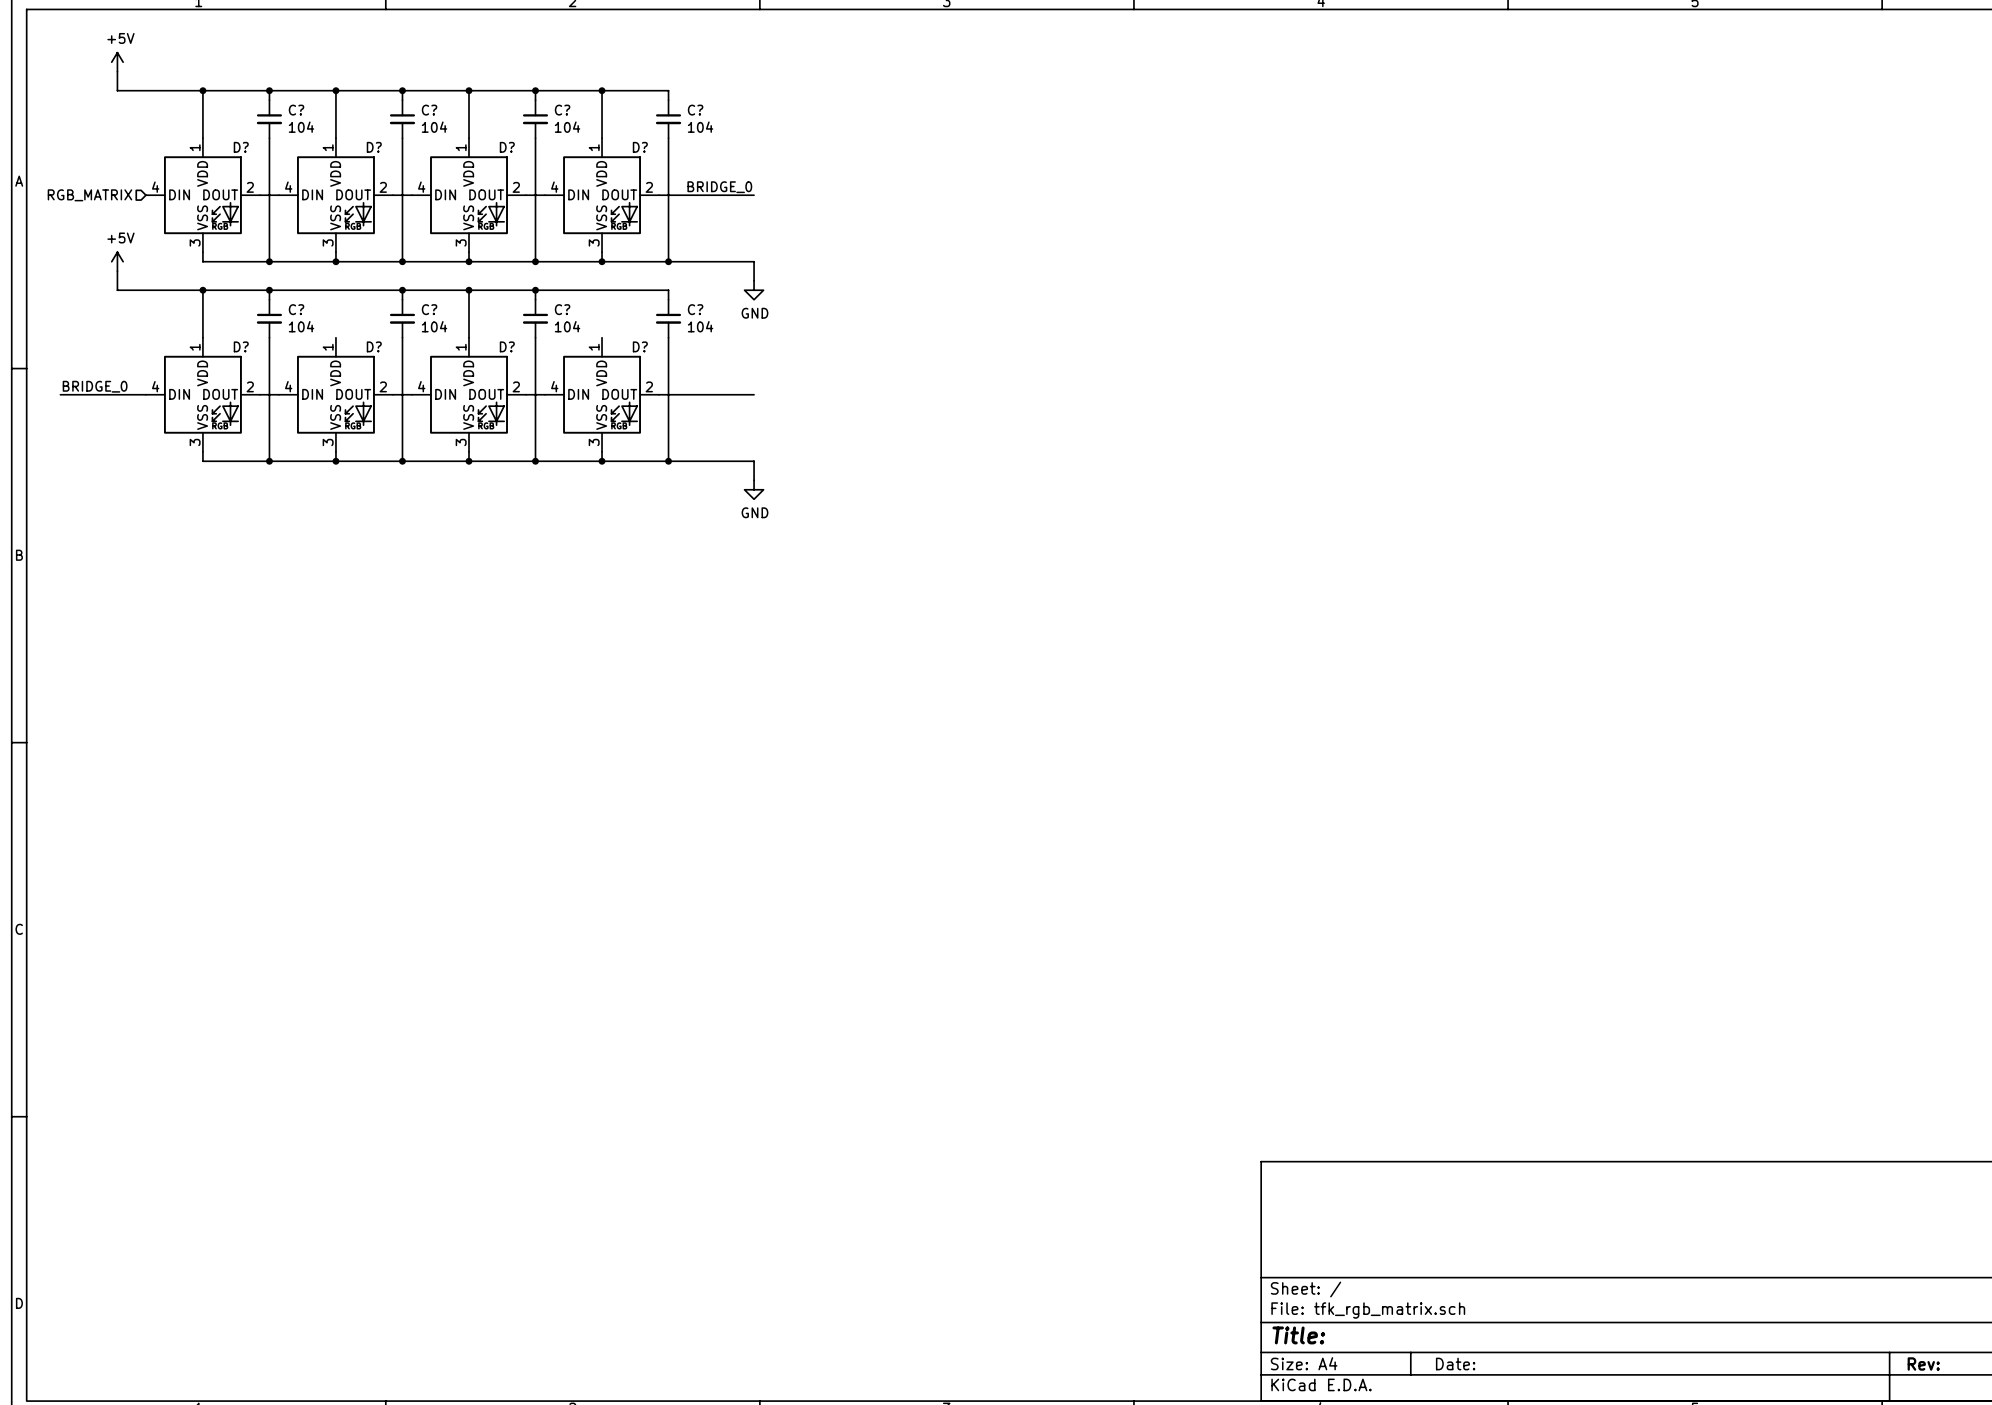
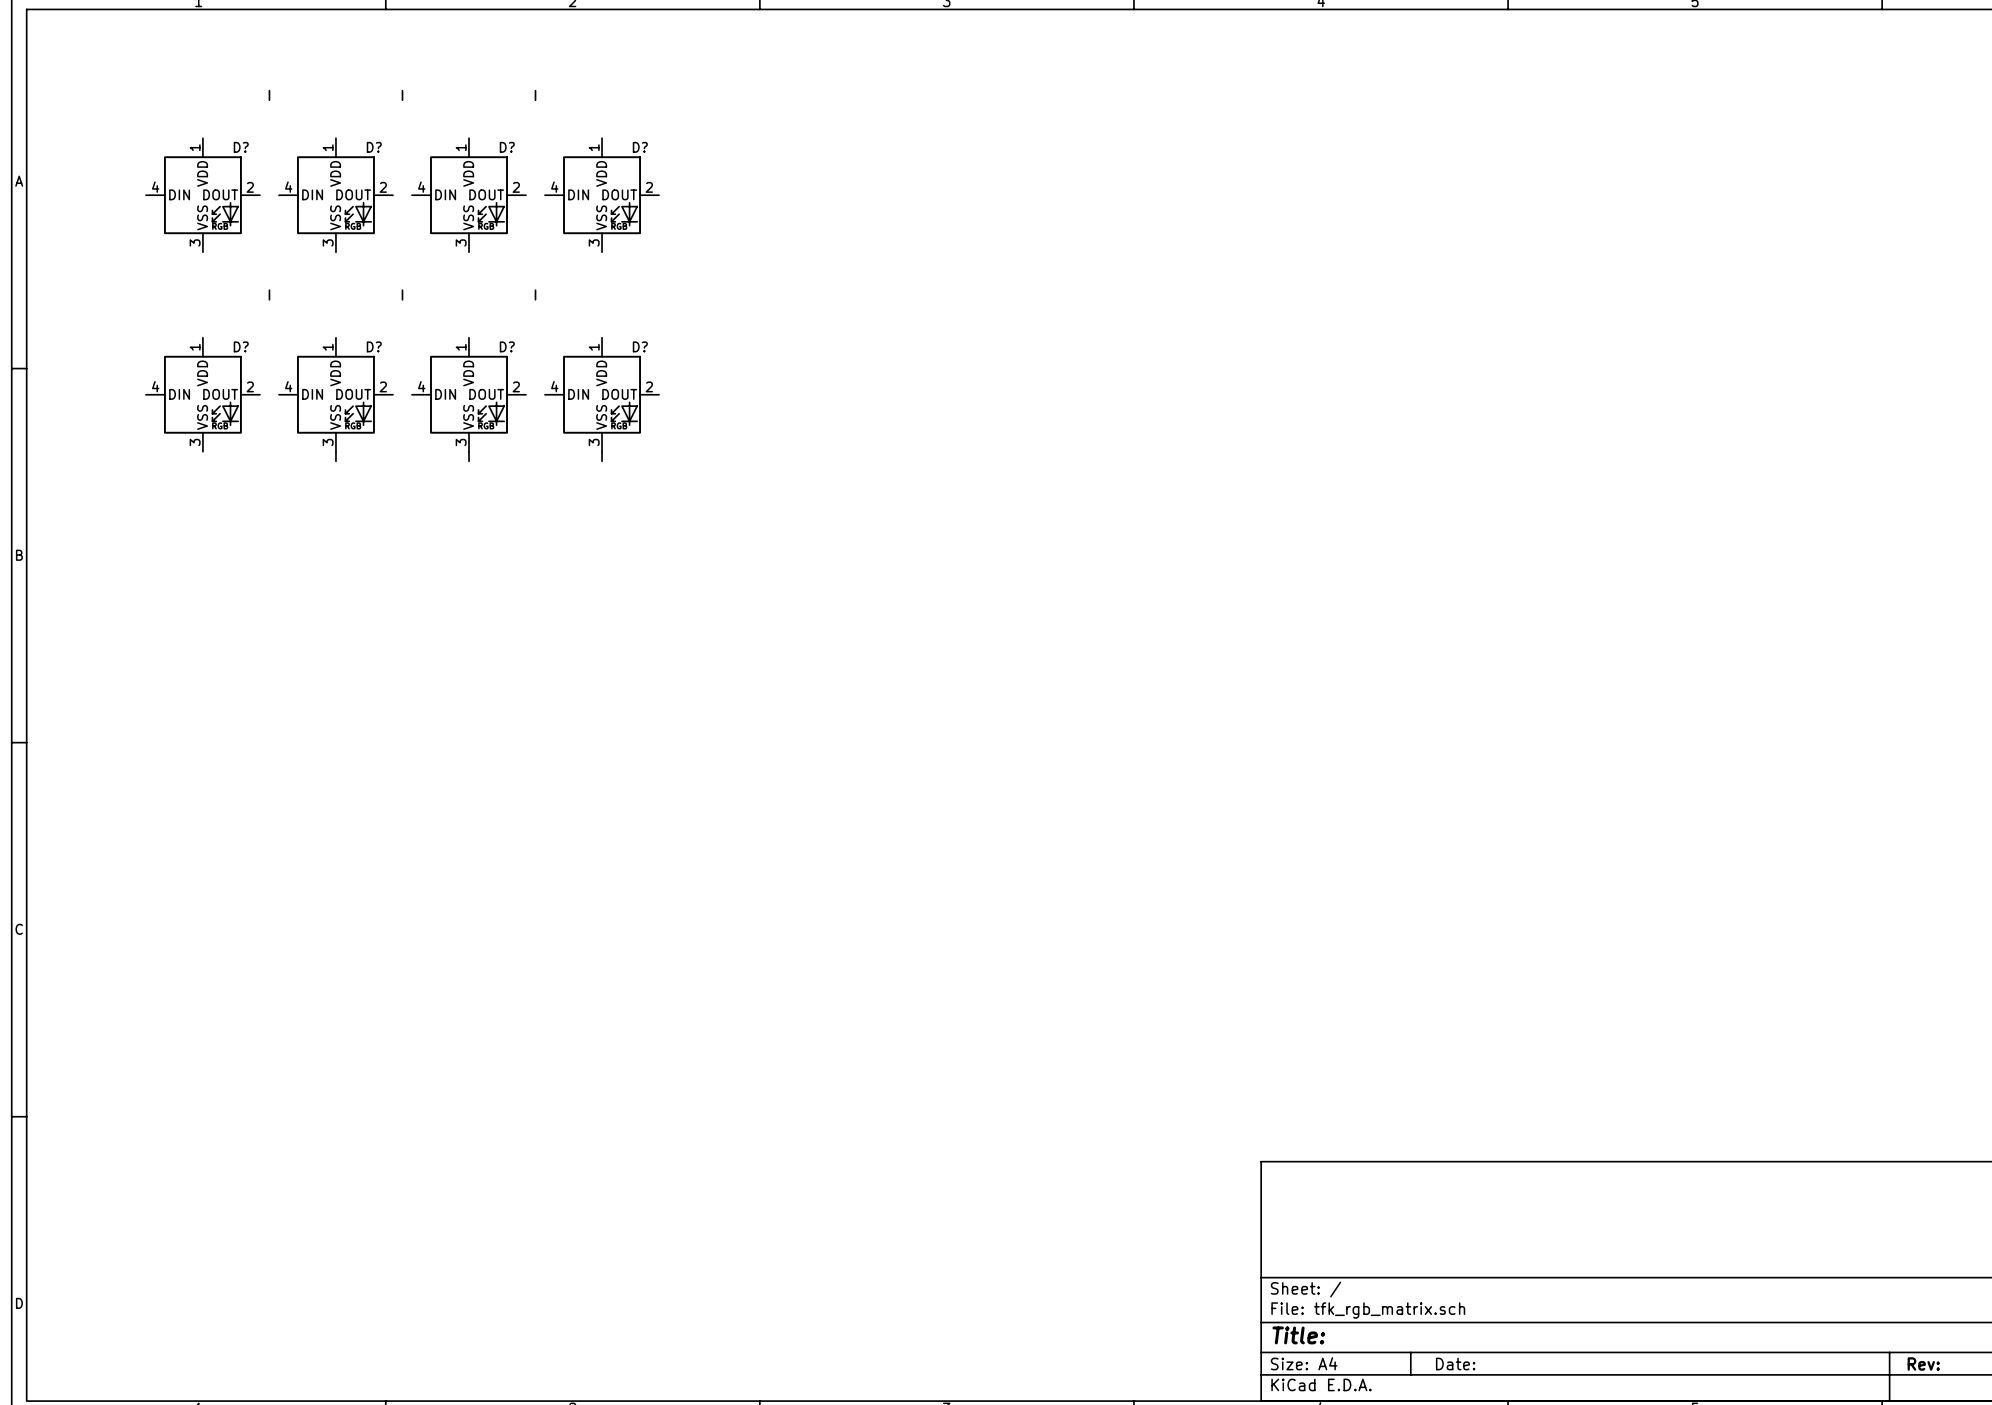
power symbol: +5V (117, 62) -> none
wire: (117, 71) (117, 90) (668, 90) (668, 100) -> none
wire: (202, 90) (202, 138) -> none
junction: (202, 90) -> none
junction: (269, 90) -> none
wire: (335, 90) (335, 138) -> none
junction: (335, 90) -> none
junction: (402, 90) -> none
wire: (468, 90) (468, 138) -> none
junction: (468, 90) -> none
junction: (535, 90) -> none
wire: (602, 90) (602, 138) -> none
junction: (602, 90) -> none
C?: 104 (269, 119) -> none
C?: 104 (402, 119) -> none
C?: 104 (535, 119) -> none
C?: 104 (668, 119) -> none
wire: (269, 138) (269, 261) -> none
wire: (402, 138) (402, 261) -> none
wire: (535, 138) (535, 261) -> none
wire: (668, 138) (668, 261) -> none
label: BRIDGE_0 (719, 187) -> none
hierarchical label: RGB_MATRIX (89, 195) -> none
wire: (259, 195) (278, 195) -> none
wire: (392, 195) (411, 195) -> none
wire: (526, 195) (545, 195) -> none
wire: (659, 195) (754, 195) -> none
wire: (202, 252) (202, 261) (754, 261) (754, 280) -> none
wire: (335, 252) (335, 261) -> none
wire: (468, 252) (468, 261) -> none
wire: (602, 252) (602, 261) -> none
power symbol: +5V (117, 261) -> none
junction: (269, 261) -> none
junction: (335, 261) -> none
junction: (402, 261) -> none
junction: (468, 261) -> none
junction: (535, 261) -> none
junction: (602, 261) -> none
junction: (668, 261) -> none
wire: (117, 271) (117, 290) (668, 290) (668, 299) -> none
wire: (202, 290) (202, 337) -> none
junction: (202, 290) -> none
junction: (269, 290) -> none
junction: (402, 290) -> none
wire: (468, 290) (468, 337) -> none
junction: (468, 290) -> none
junction: (535, 290) -> none
power symbol: GND (754, 290) -> none
C?: 104 (269, 318) -> none
C?: 104 (402, 318) -> none
C?: 104 (535, 318) -> none
C?: 104 (668, 318) -> none
wire: (269, 337) (269, 461) -> none
wire: (402, 337) (402, 461) -> none
wire: (535, 337) (535, 461) -> none
wire: (668, 337) (668, 461) -> none
label: BRIDGE_0 (95, 386) -> none
wire: (60, 394) (145, 394) -> none
wire: (259, 394) (278, 394) -> none
wire: (392, 394) (411, 394) -> none
wire: (526, 394) (545, 394) -> none
wire: (659, 394) (754, 394) -> none
wire: (202, 451) (202, 461) (754, 461) (754, 480) -> none
junction: (269, 461) -> none
junction: (335, 461) -> none
junction: (402, 461) -> none
junction: (468, 461) -> none
junction: (535, 461) -> none
junction: (602, 461) -> none
junction: (668, 461) -> none
power symbol: GND (754, 489) -> none

